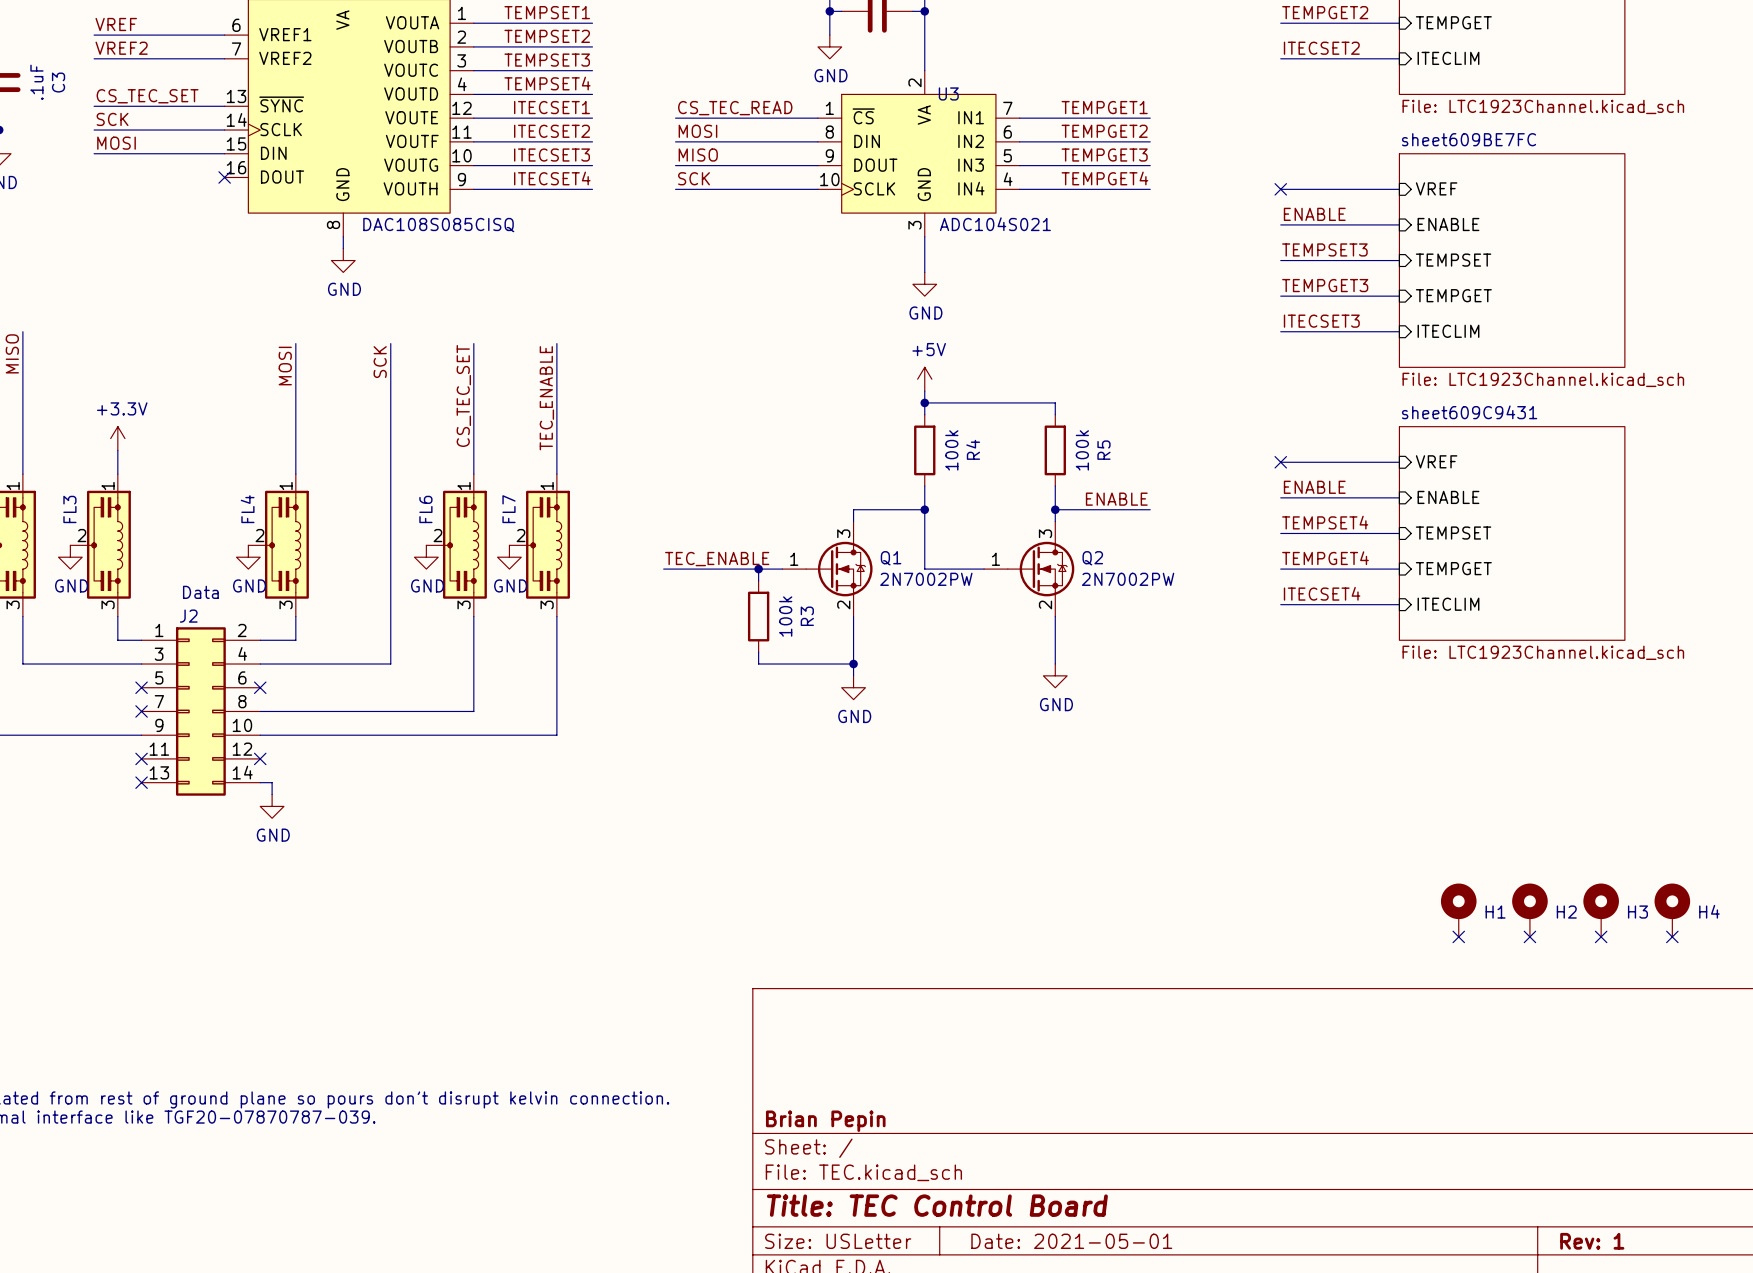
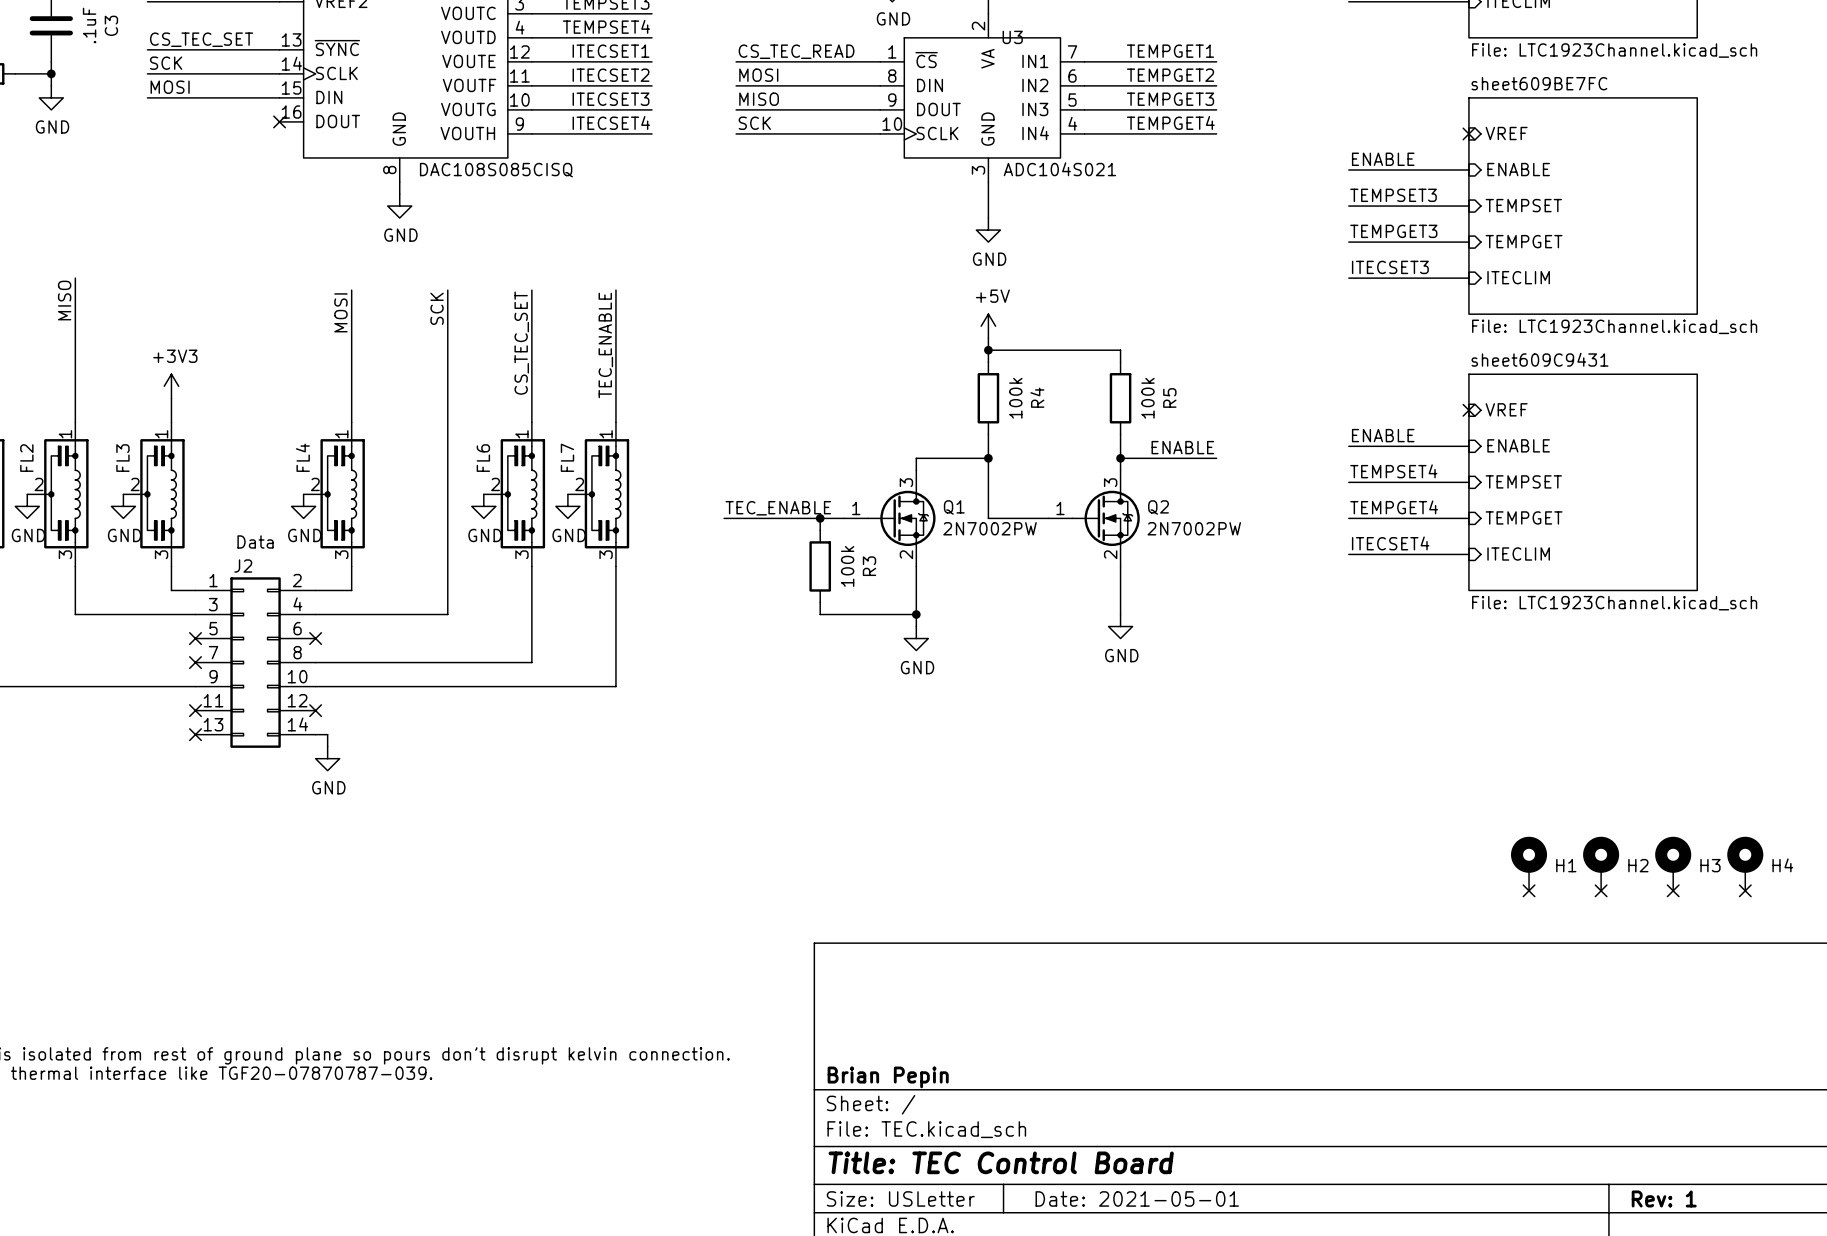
wire: (1280, 189) (1399, 189) -> none
no-connect mark: (1280, 189) -> none
no-connect mark: none -> (1468, 133)
power symbol: +3.3V (117, 438) -> +3V3 (171, 386)
wire: (1280, 462) (1399, 462) -> none
no-connect mark: (1280, 462) -> none
no-connect mark: none -> (1468, 410)

